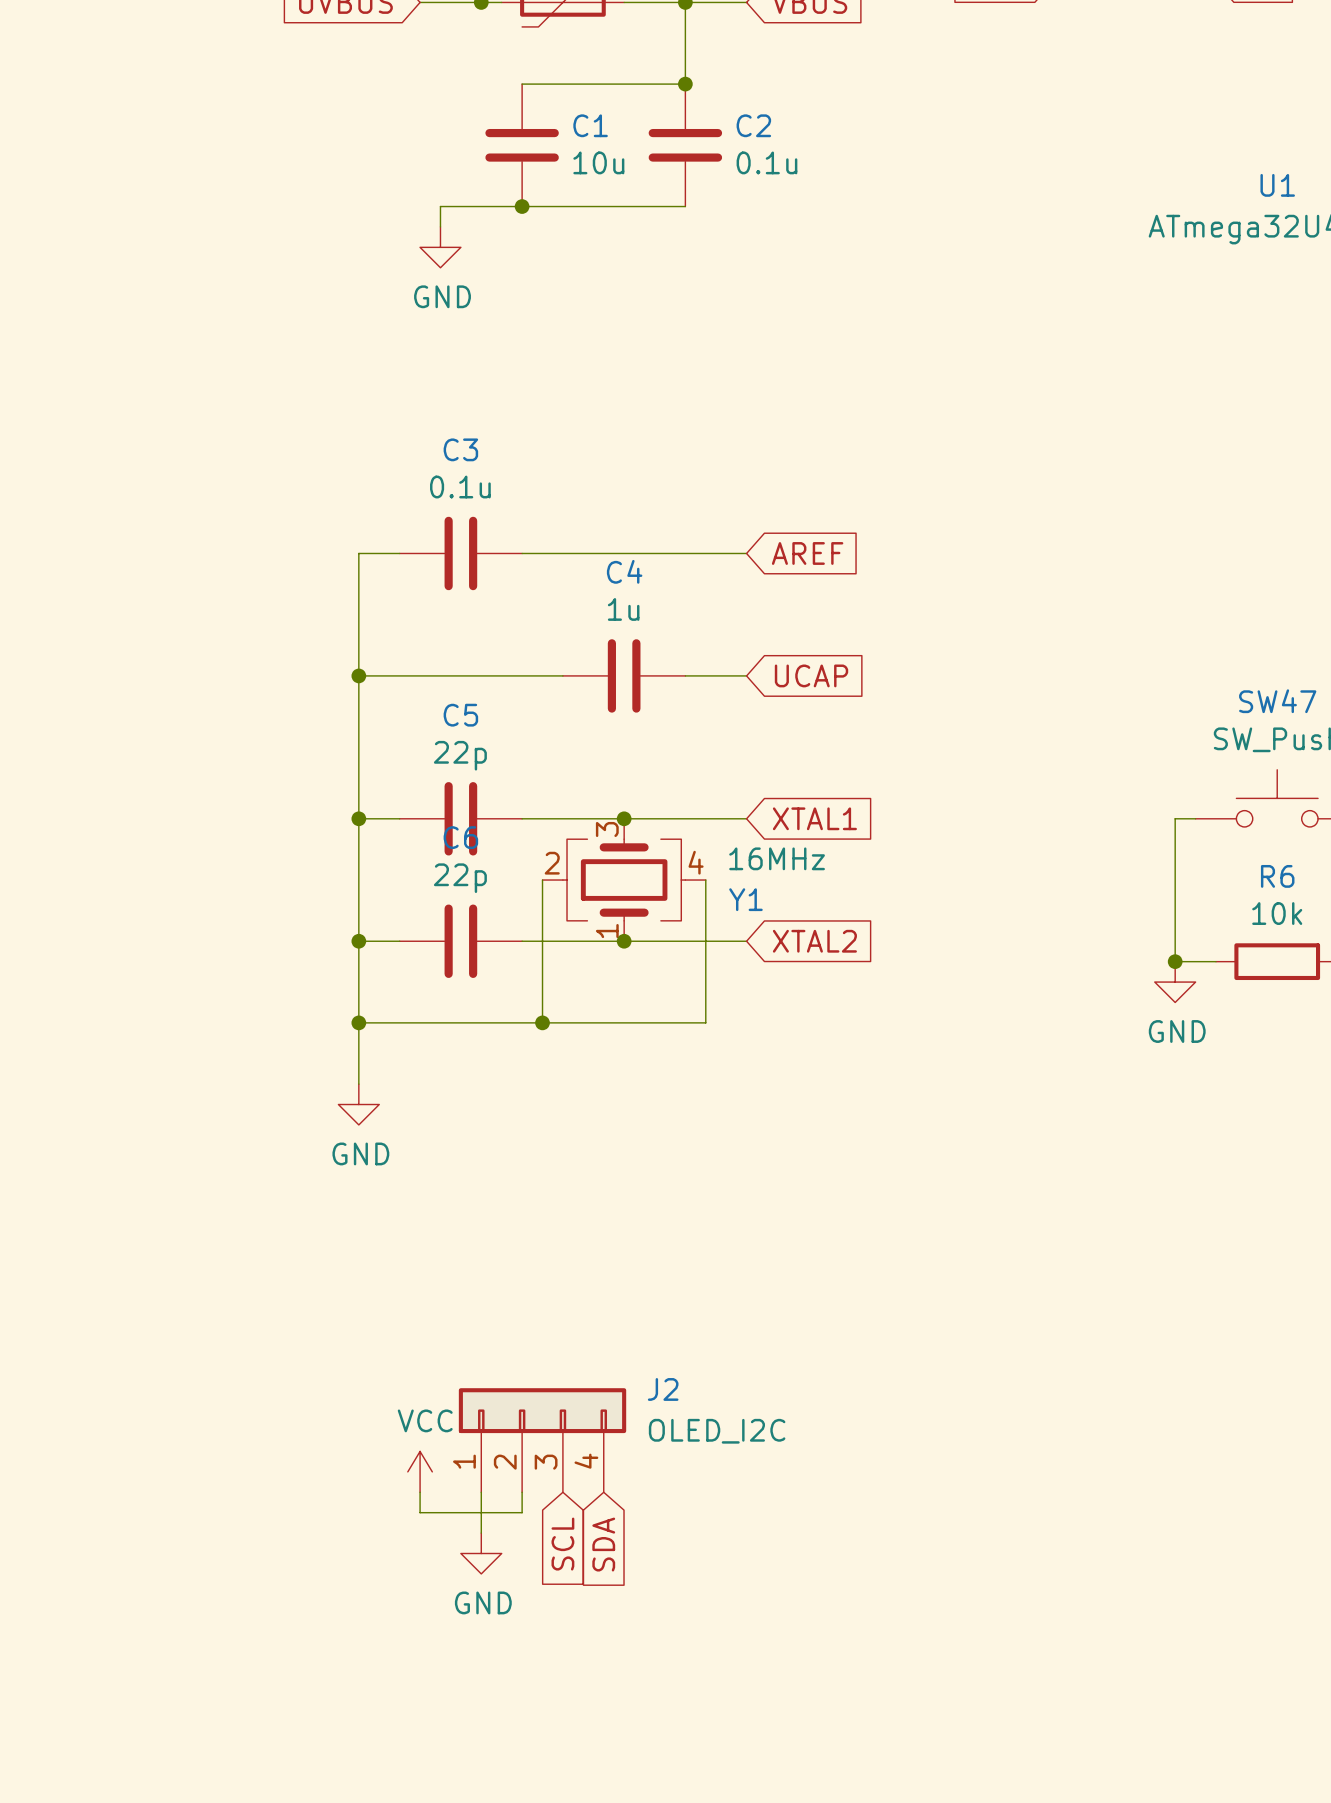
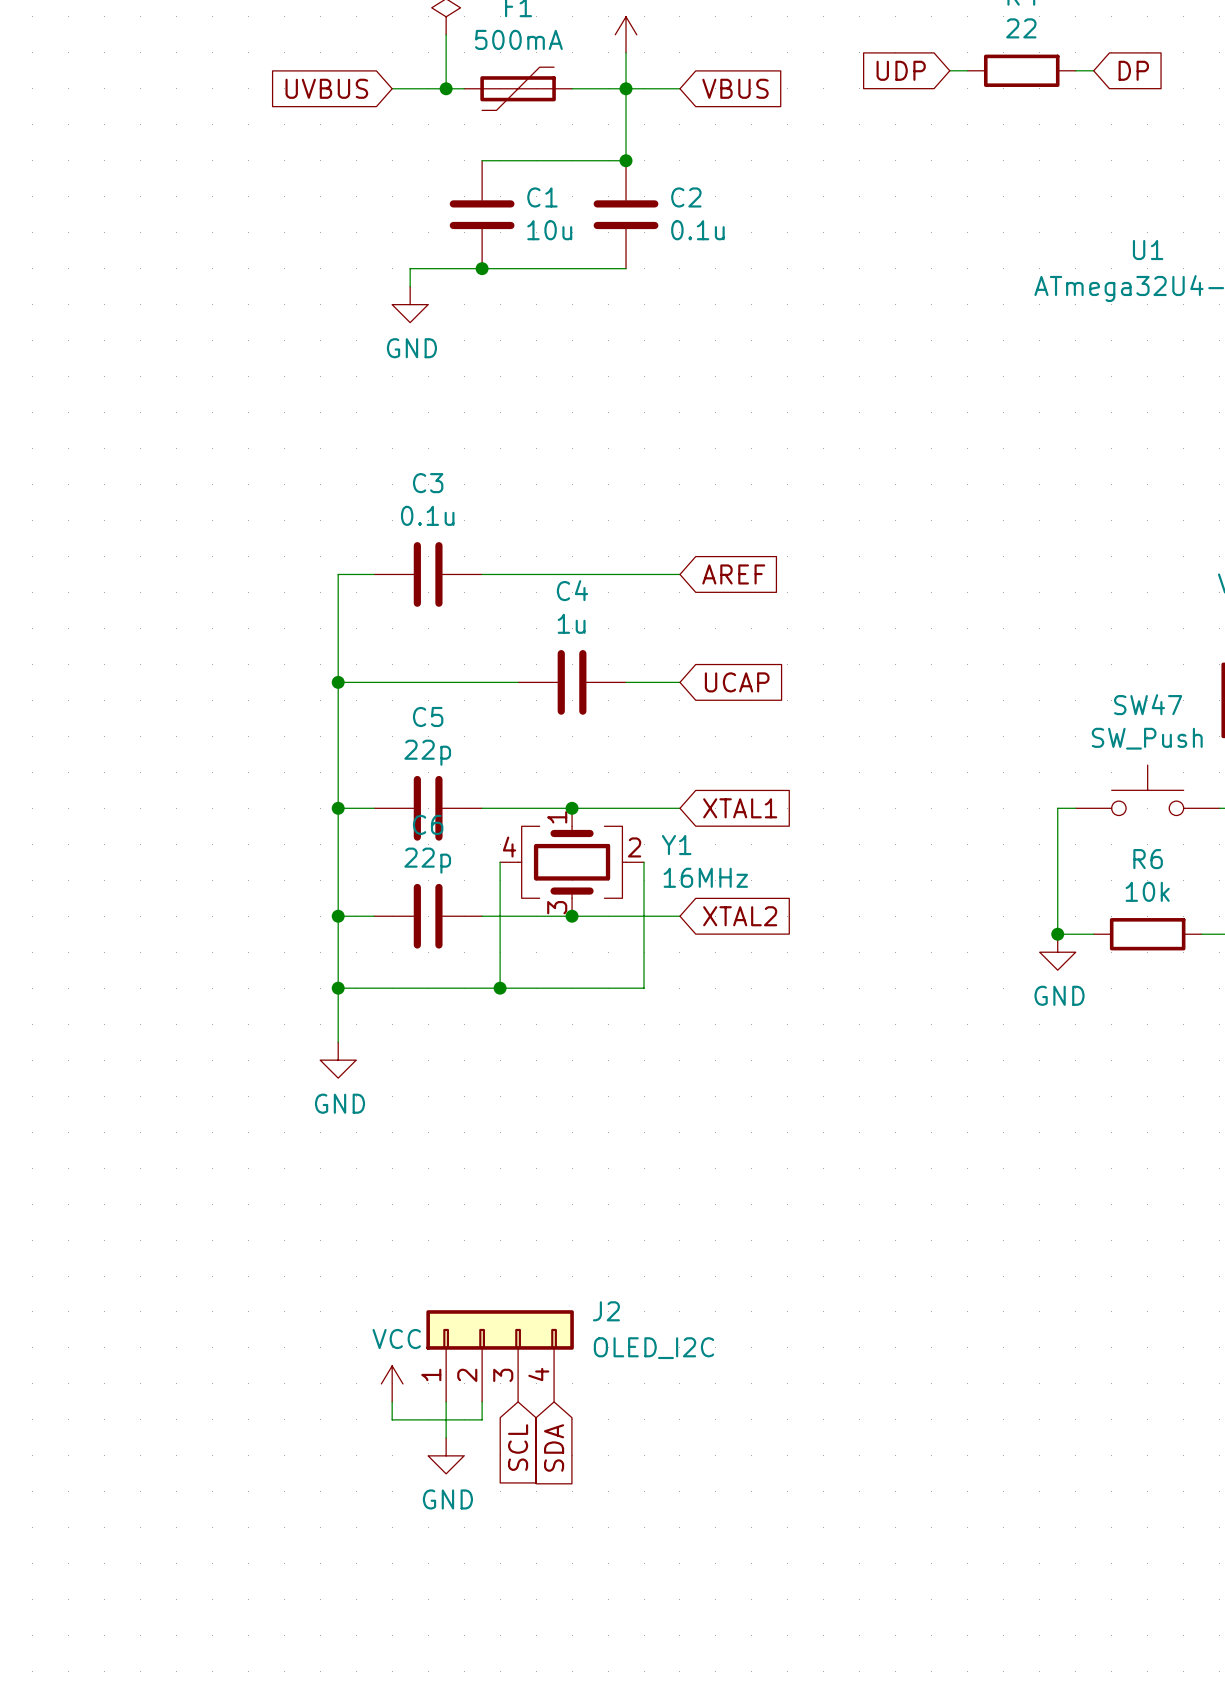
Y1 value position: 16MHz (777, 858) -> 16MHz (705, 877)
Y1 rotation: 0° (624, 880) -> 180° (572, 862)
Y1 name position: Y1 (745, 899) -> Y1 (676, 845)

